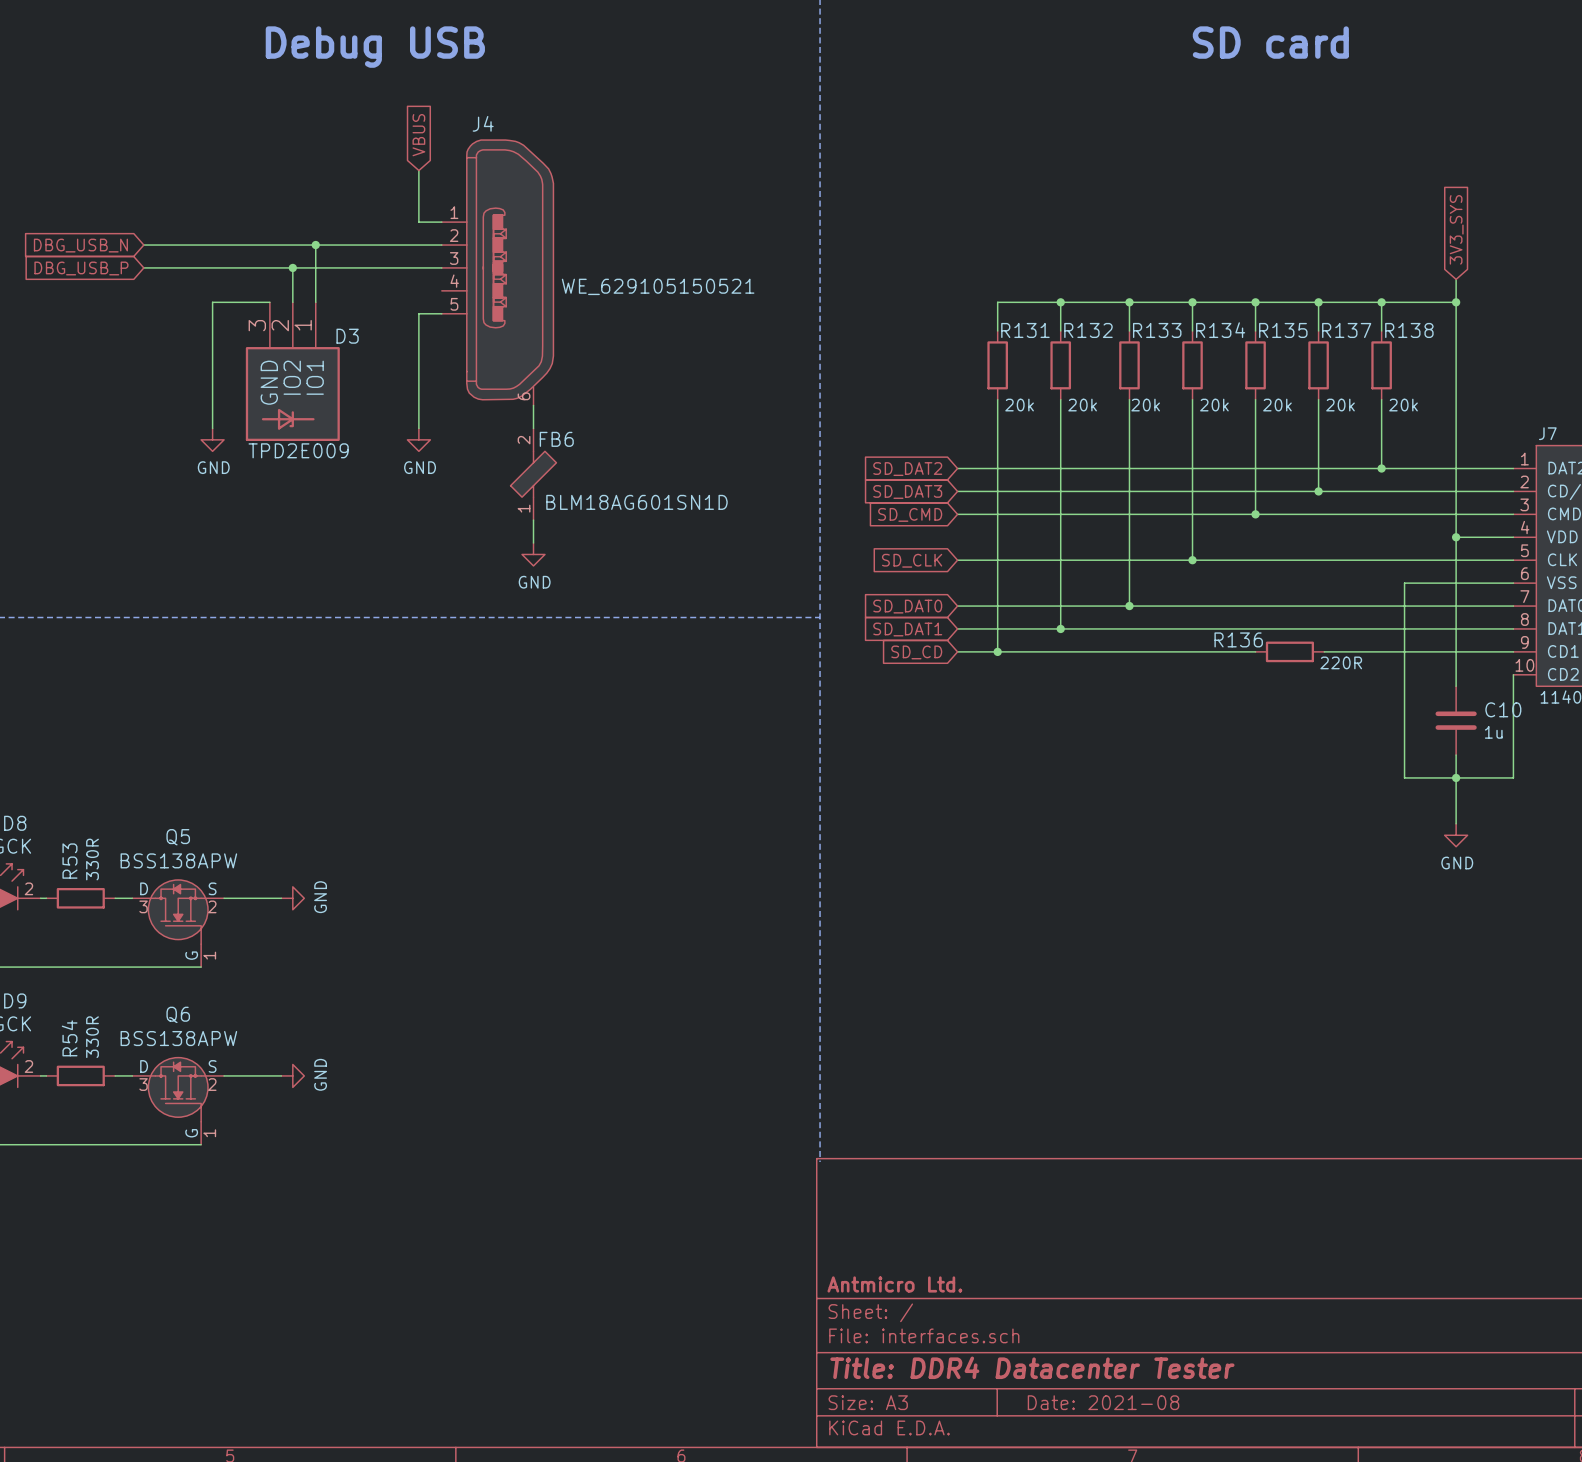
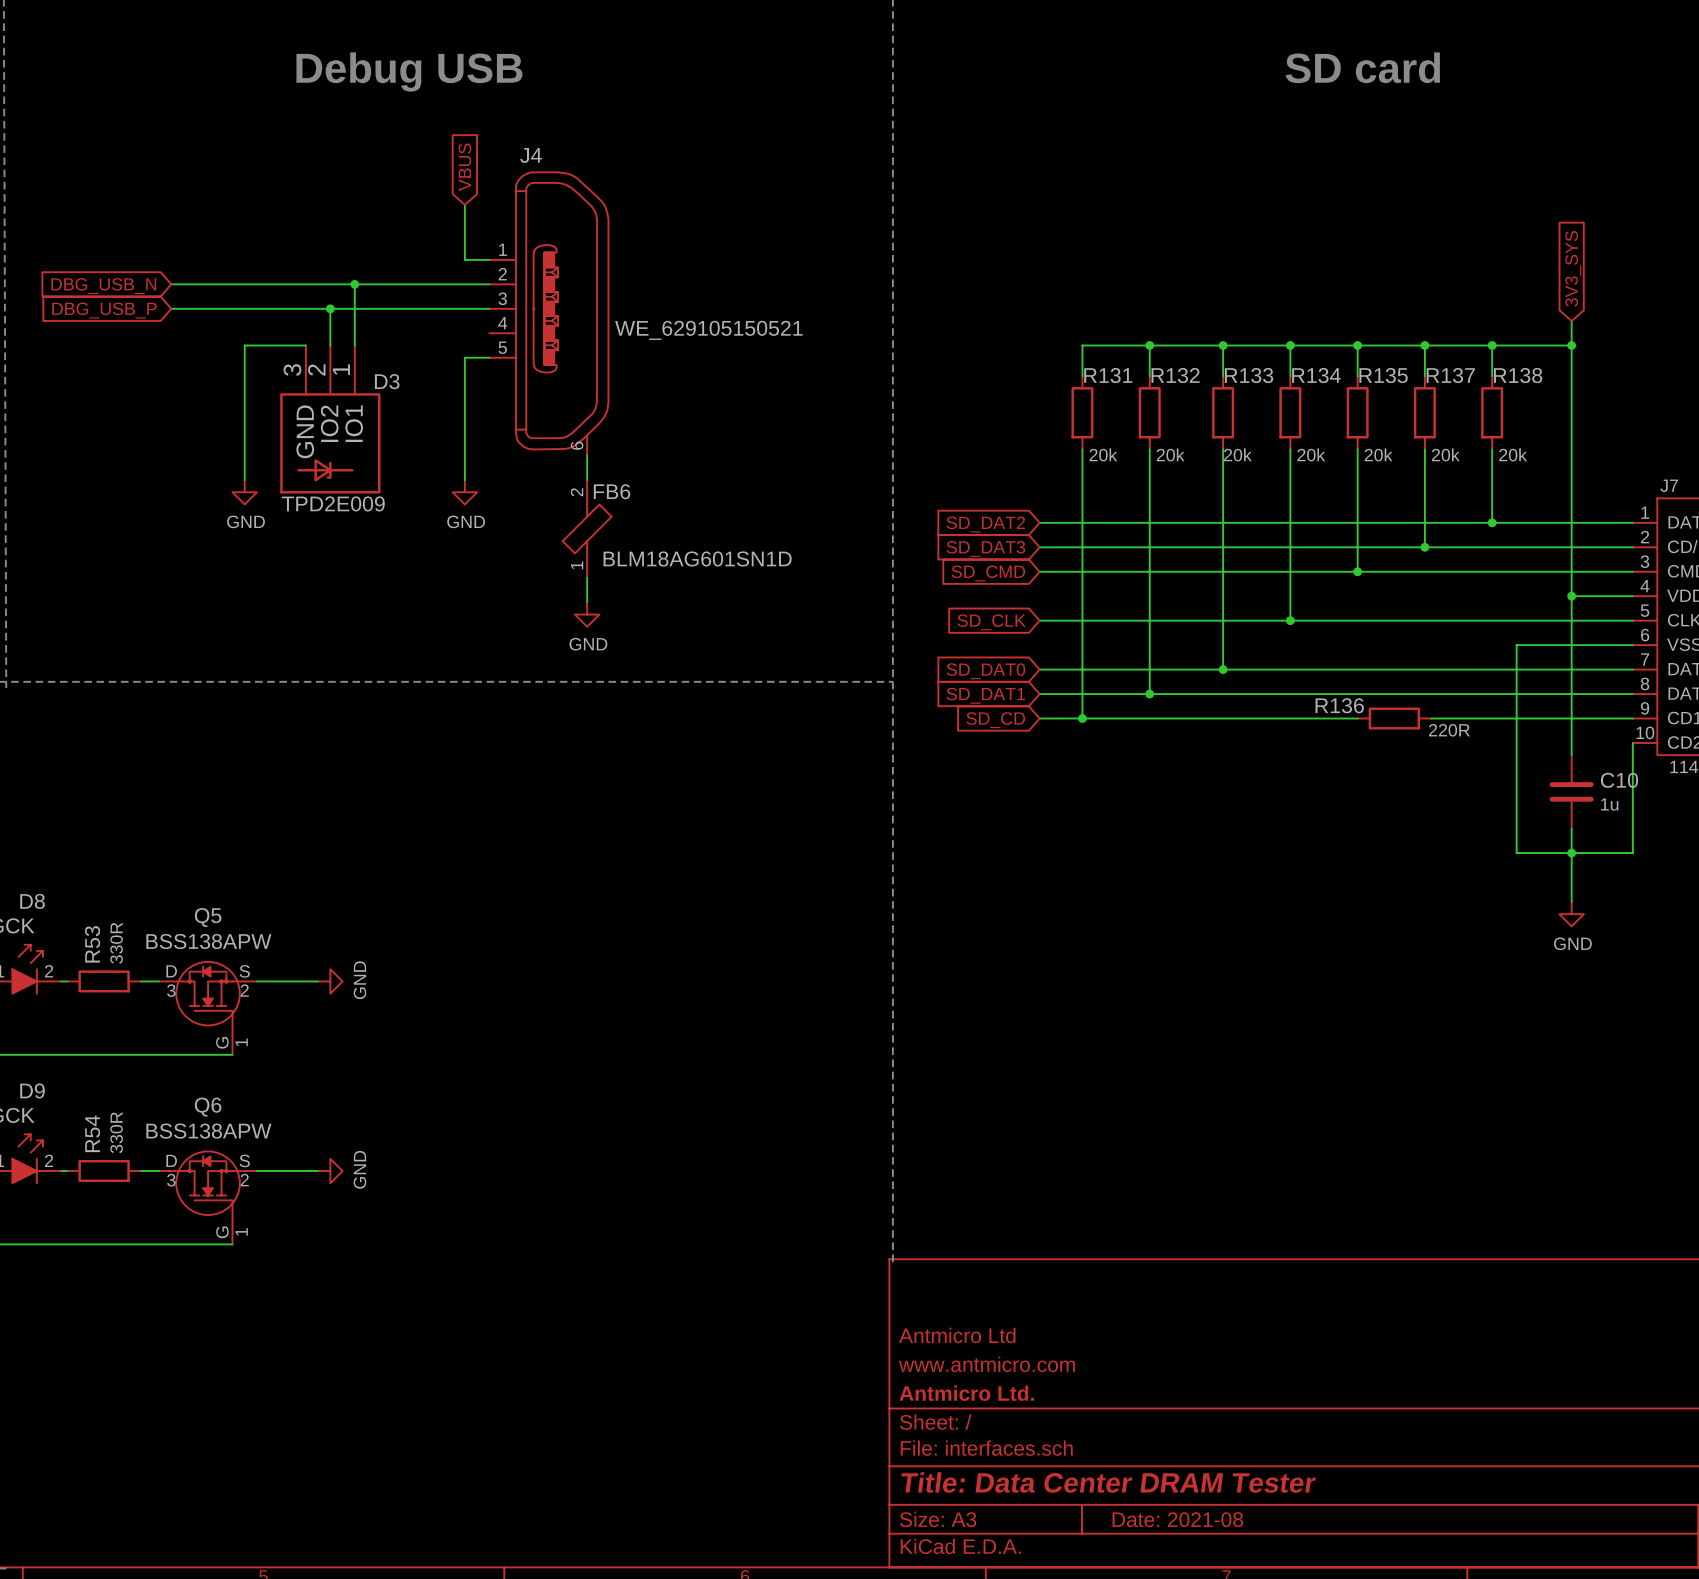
title block: none -> Antmicro Ltd (957, 1335)
title block: none -> www.antmicro.com (986, 1364)
title block: Title: DDR4 Datacenter Tester (1032, 1367) -> Title: Data Center DRAM Tester (1108, 1482)

